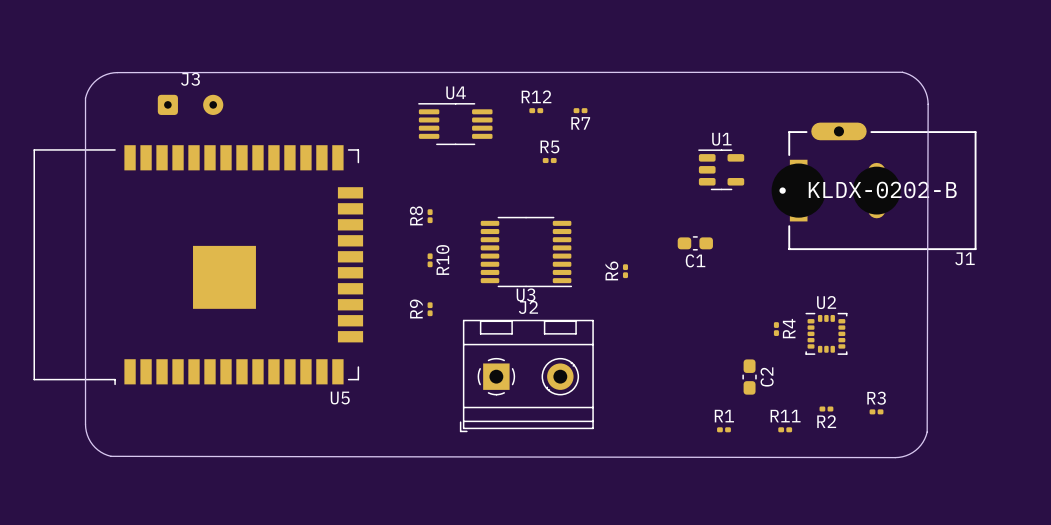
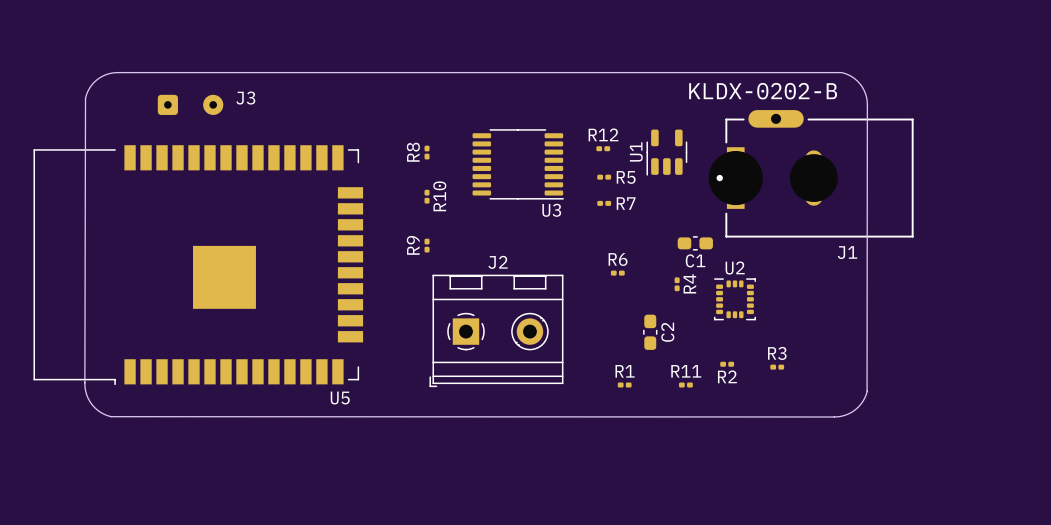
board edge: (117, 72) (902, 72) (909, 74) (923, 86) (928, 104) (927, 432) (924, 438) (912, 452) (895, 457) (107, 455) (92, 444) (85, 428) (85, 98) -> (117, 72) (841, 72)
board edge: none -> (841, 72) (851, 76) (860, 84) (867, 100) (867, 390)
J3 name position: J3 (190, 79) -> J3 (245, 98)
board edge: none -> (85, 98) (84, 386) (91, 404) (107, 415) (834, 417) (845, 415) (855, 409) (863, 401) (867, 390)
R12 position: (536, 110) -> (603, 148)
R7 position: (580, 110) -> (604, 203)
R7 name position: R7 (580, 123) -> R7 (626, 203)
U4: (455, 124) -> none
R5 name position: R5 (549, 146) -> R5 (626, 177)
R5 position: (549, 160) -> (604, 177)
U1 rotation: 0° (721, 169) -> 90° counterclockwise (666, 152)
U1 position: (721, 169) -> (666, 152)
J1 position: (874, 186) -> (811, 173)
J1 value position: KLDX-0202-B (882, 190) -> KLDX-0202-B (763, 91)
R8 position: (430, 216) -> (427, 152)
U3 position: (526, 251) -> (518, 164)
J1 name position: J1 (964, 258) -> J1 (847, 252)
R10 position: (430, 260) -> (427, 196)
R6 rotation: 0° (625, 271) -> 90° clockwise (617, 273)
U3 name position: U3 (526, 294) -> U3 (551, 210)
R9 position: (430, 309) -> (427, 245)
R4 position: (776, 329) -> (677, 284)
U2 position: (826, 333) -> (734, 299)
J2 position: (526, 375) -> (496, 330)
C2 position: (749, 377) -> (650, 332)
R2 position: (826, 409) -> (727, 364)
R3 position: (876, 411) -> (777, 367)
R1 position: (723, 429) -> (624, 385)
R11 position: (785, 429) -> (685, 385)

